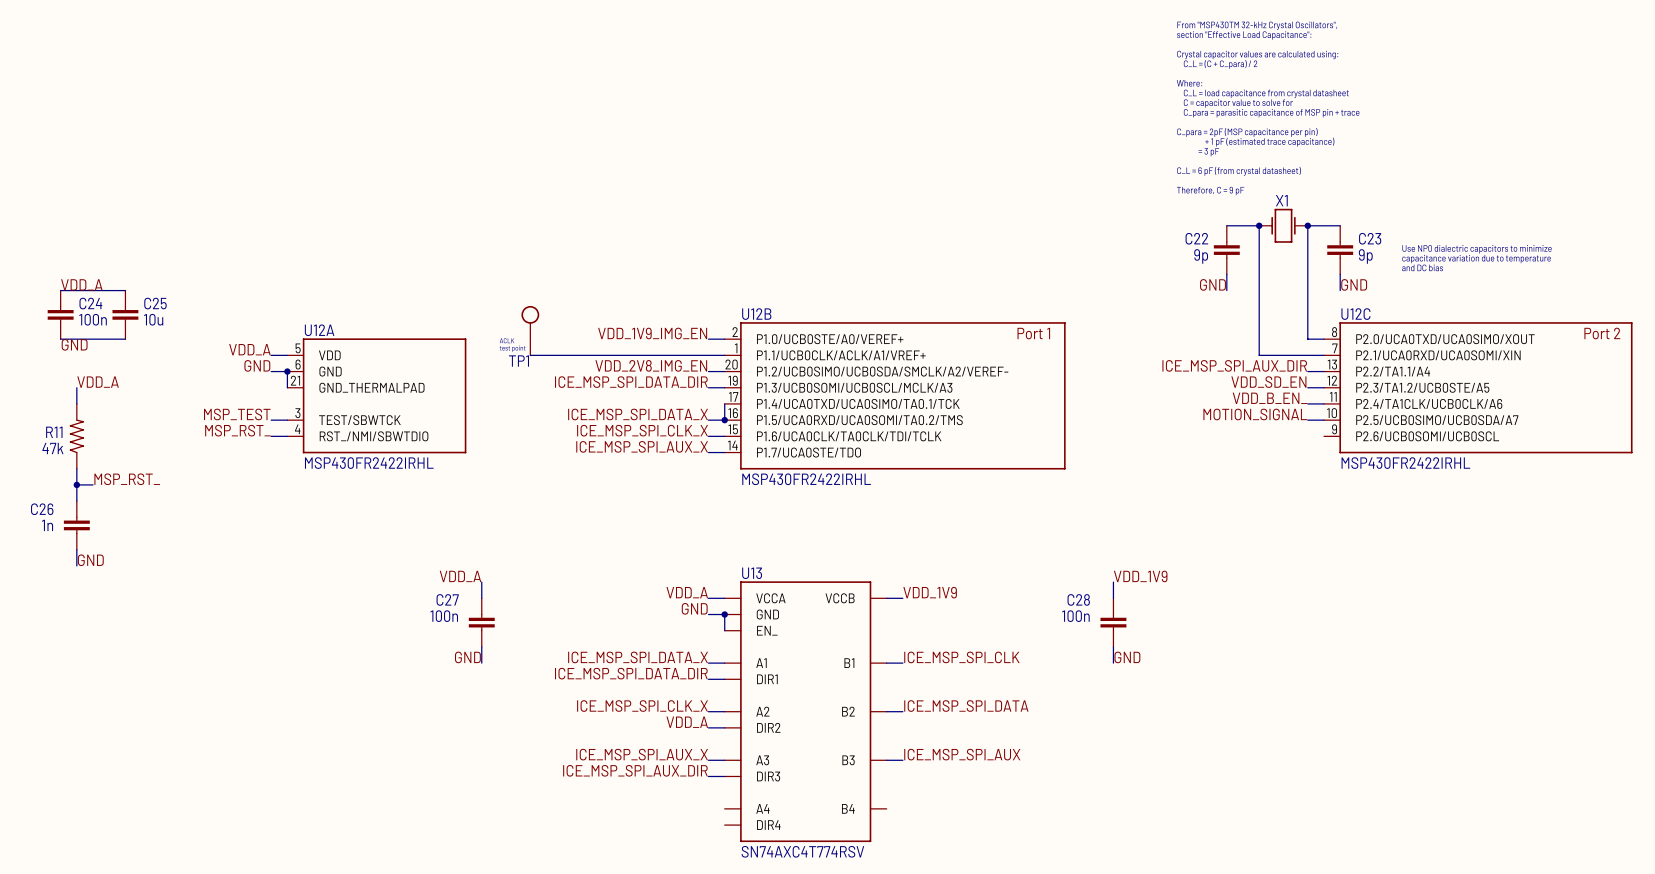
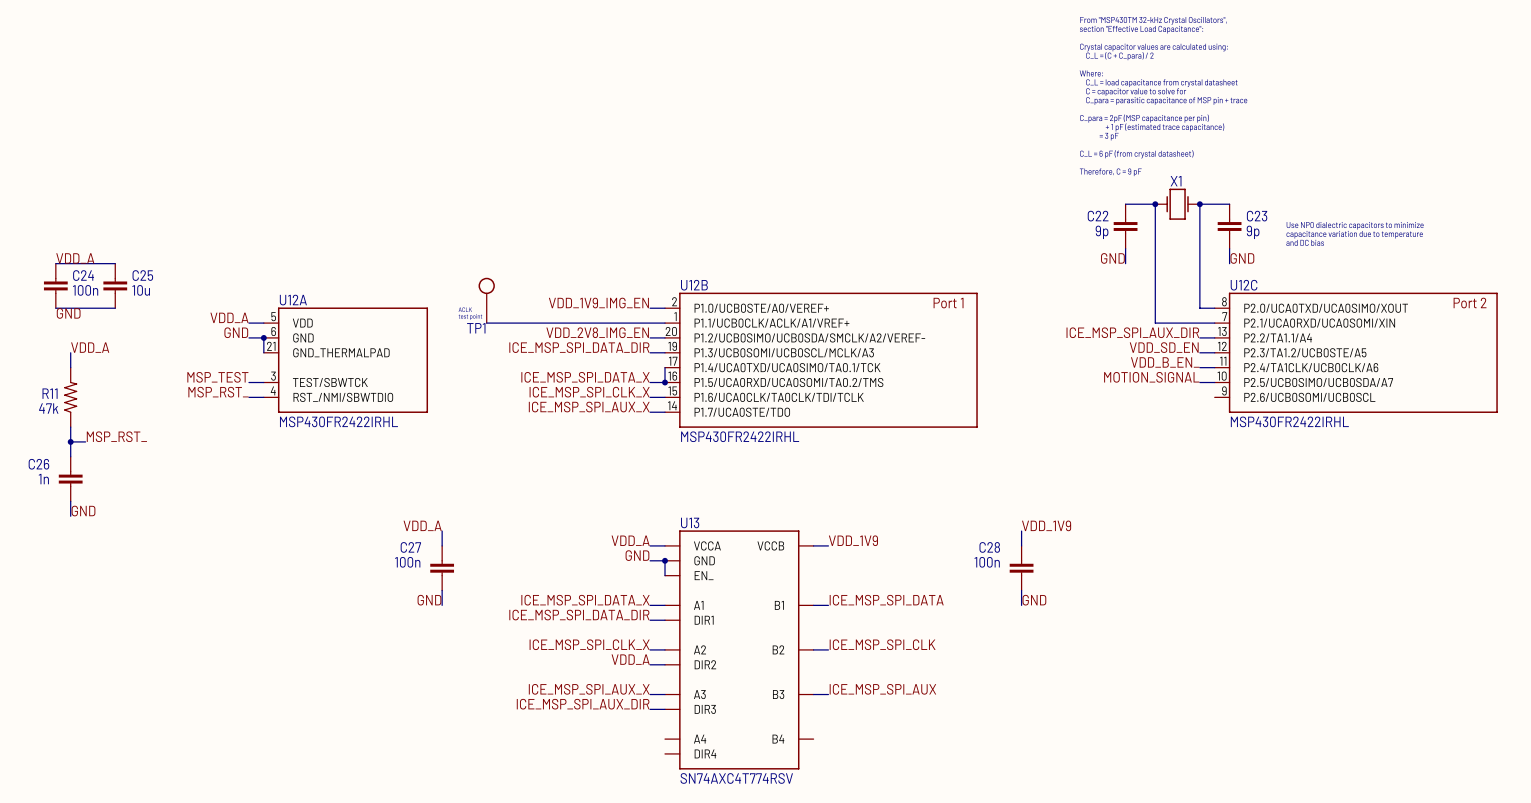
label: ICE_MSP_SPI_CLK (961, 657) -> ICE_MSP_SPI_DATA (886, 600)
label: ICE_MSP_SPI_DATA (966, 706) -> ICE_MSP_SPI_CLK (882, 644)

